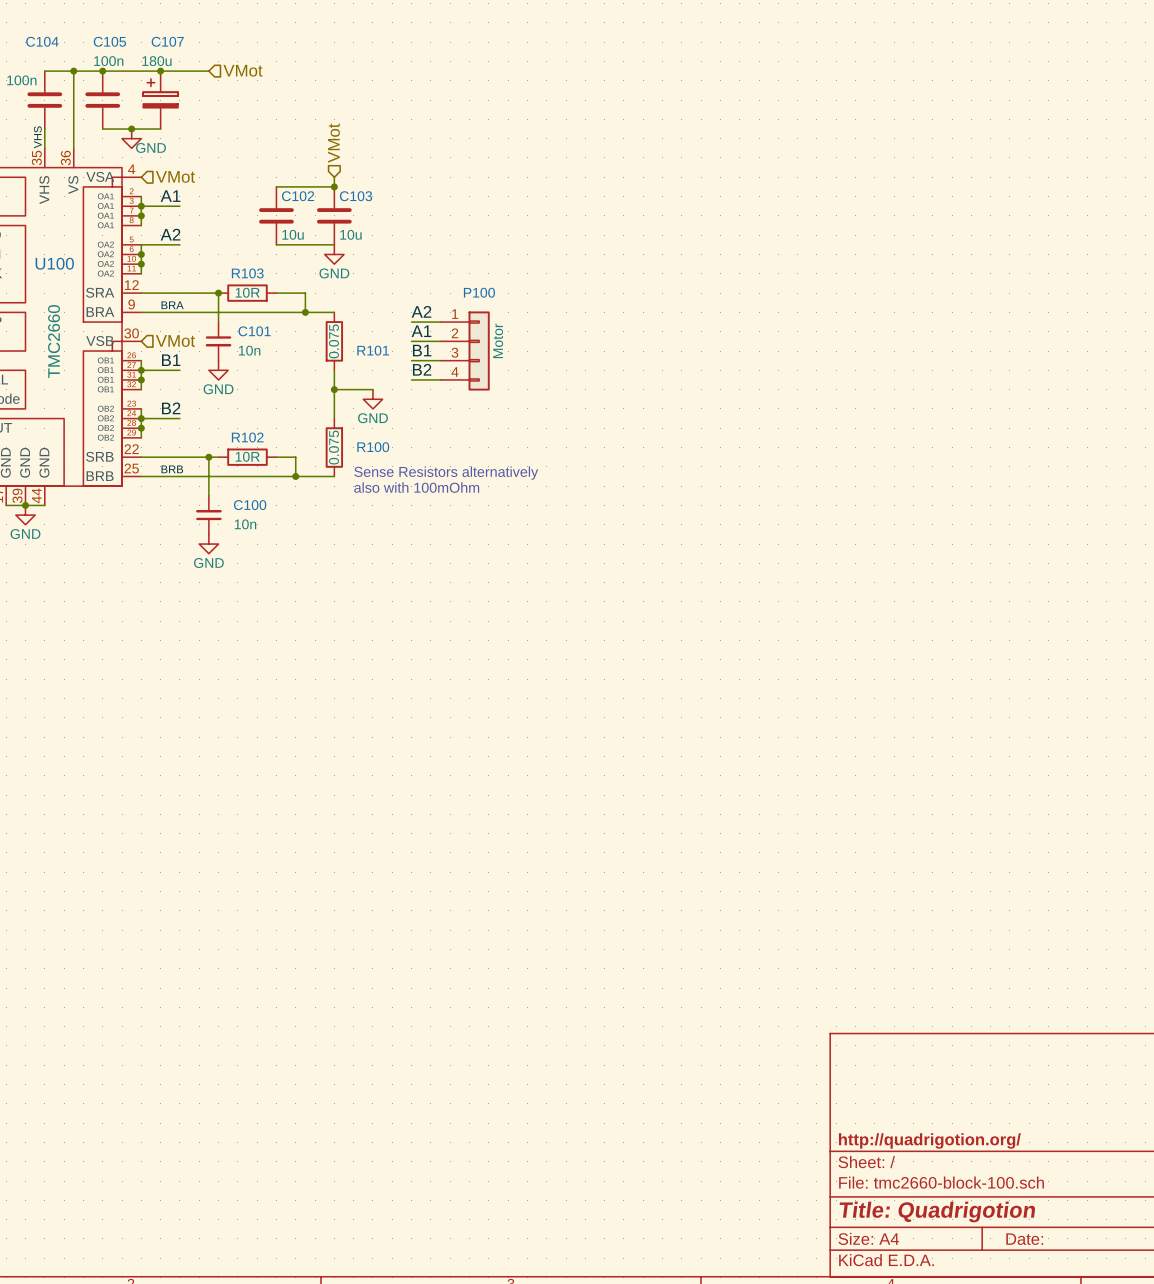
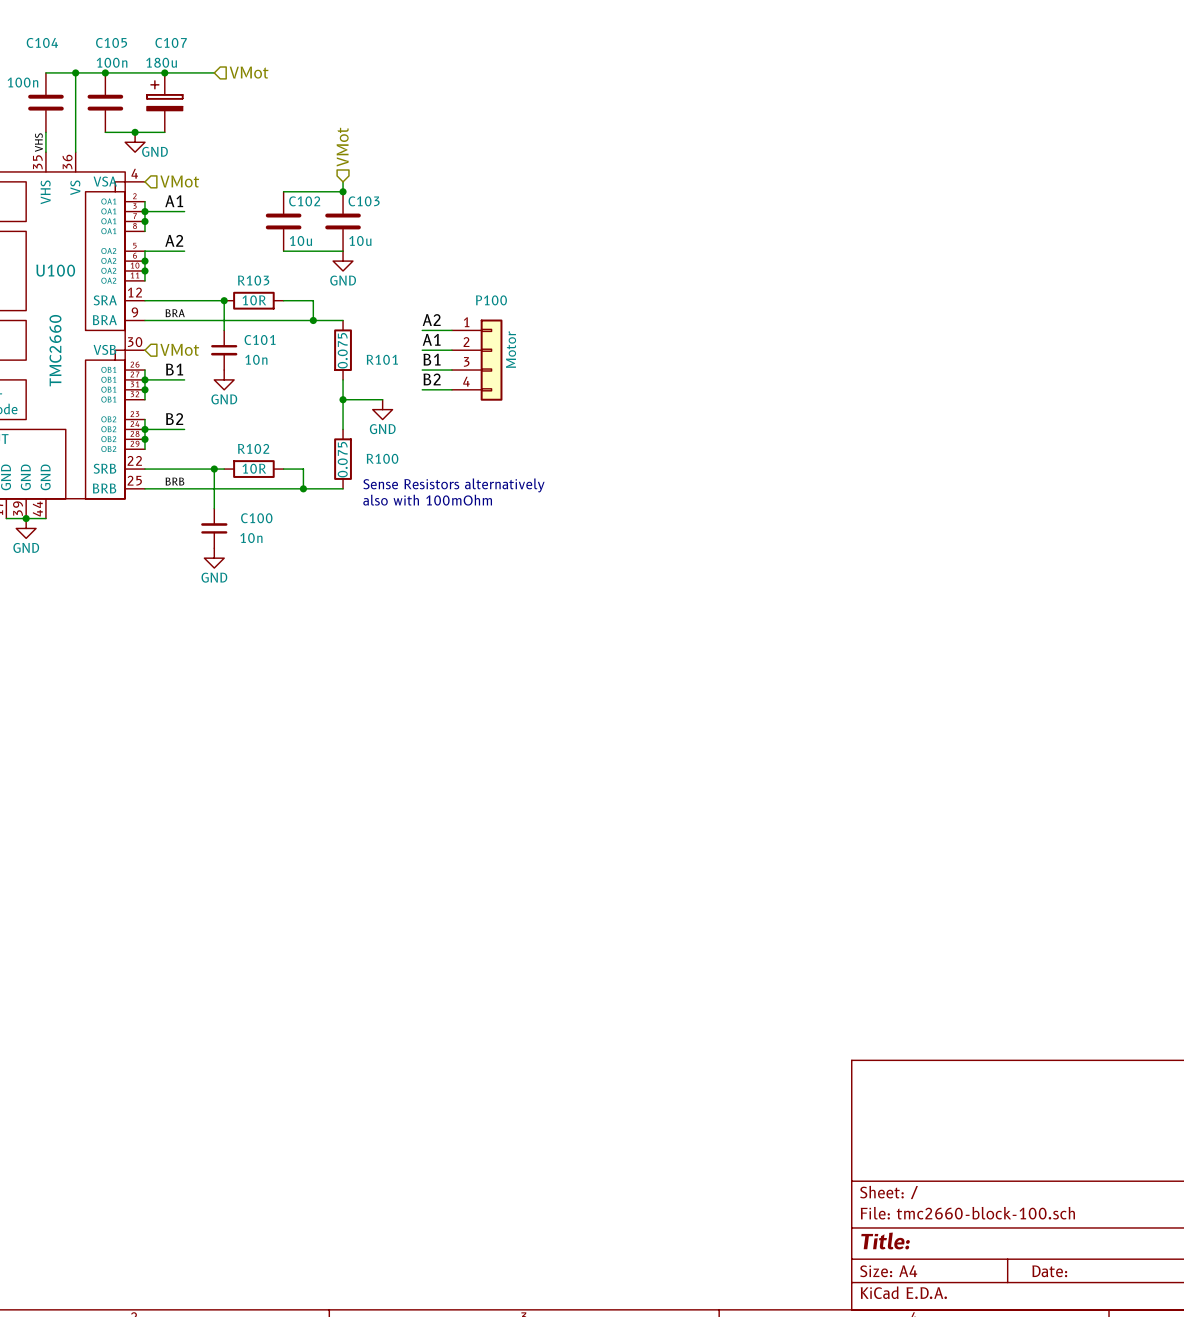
title block: http://quadrigotion.org/ (929, 1140) -> none
title block: Title: Quadrigotion (937, 1211) -> Title: (885, 1240)

